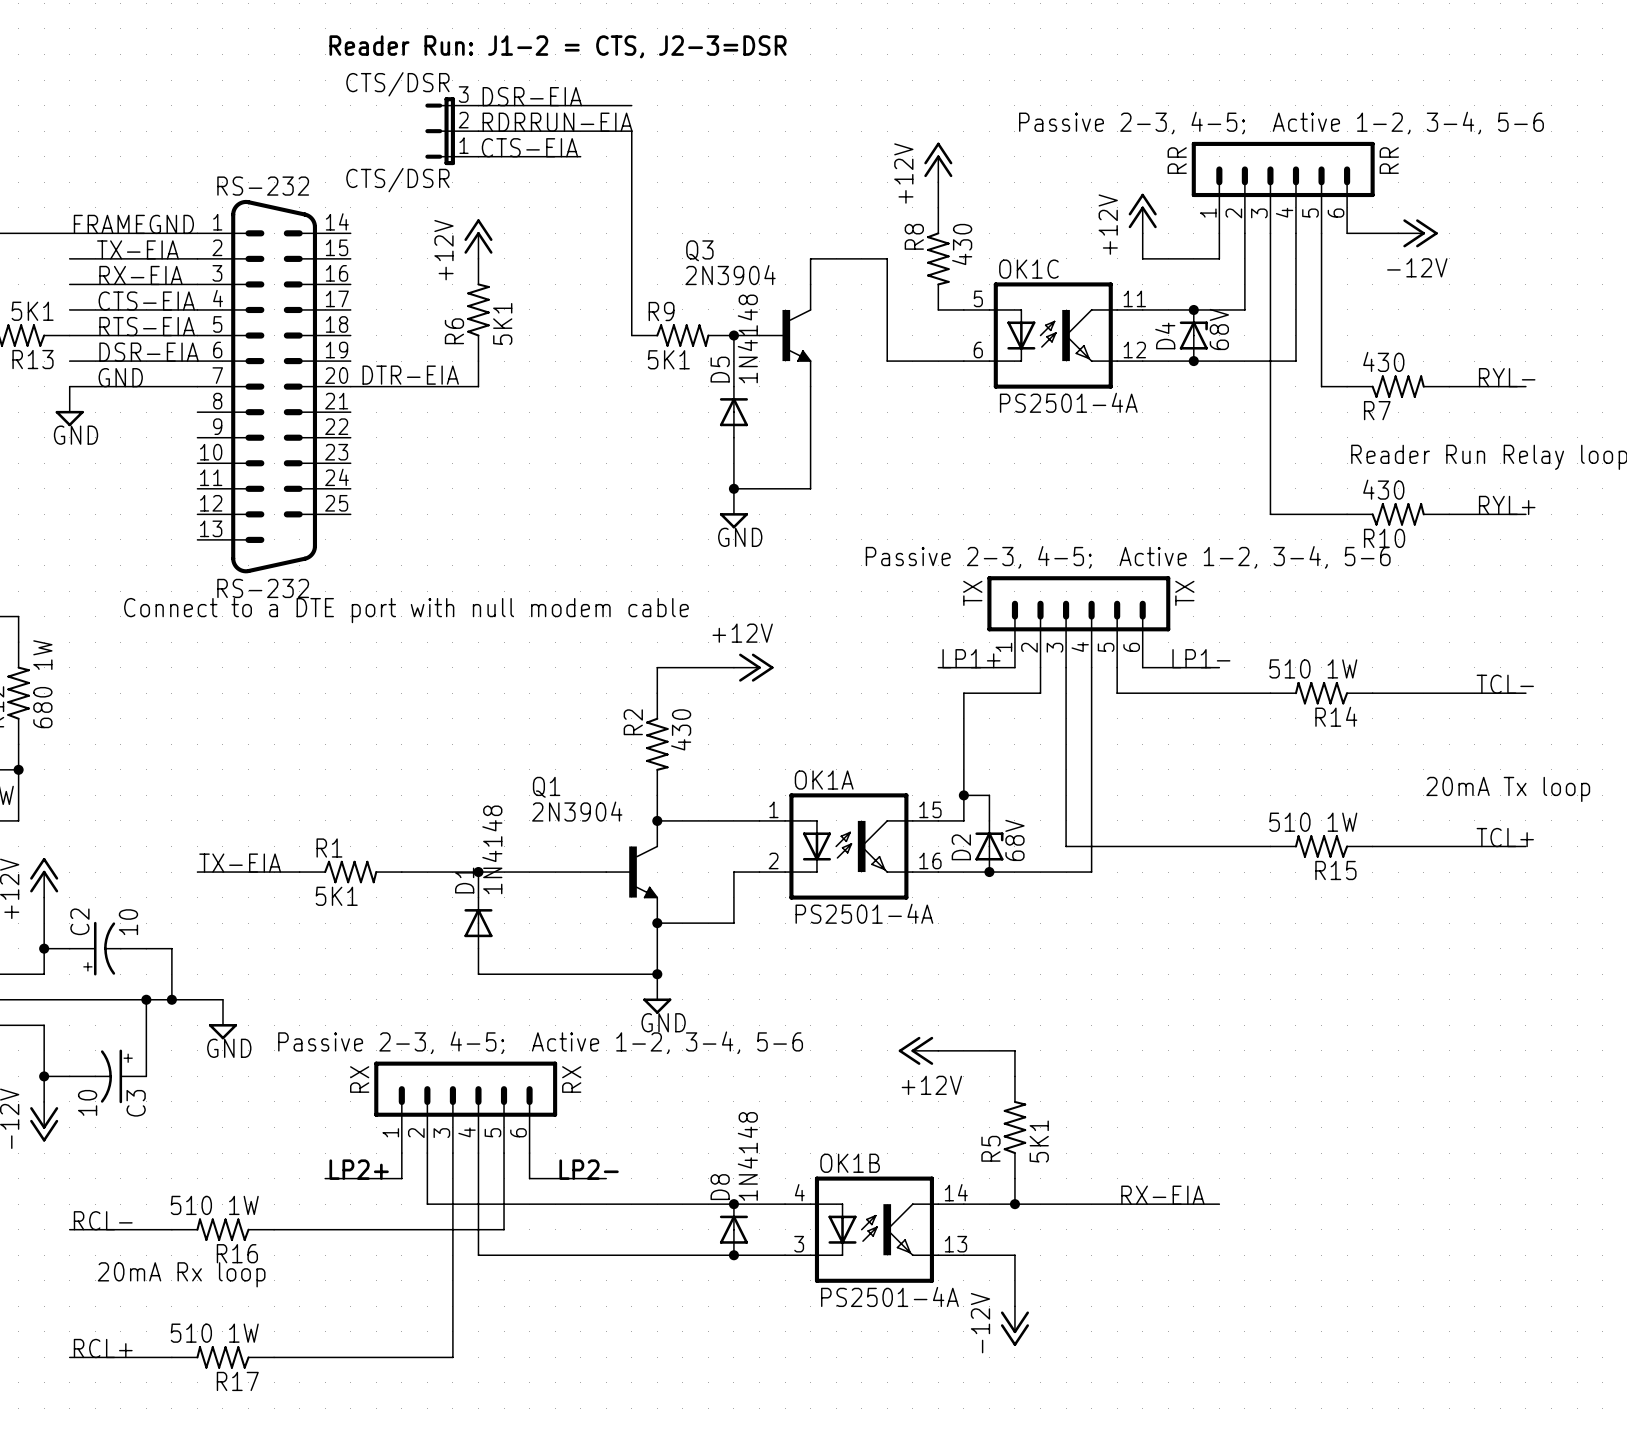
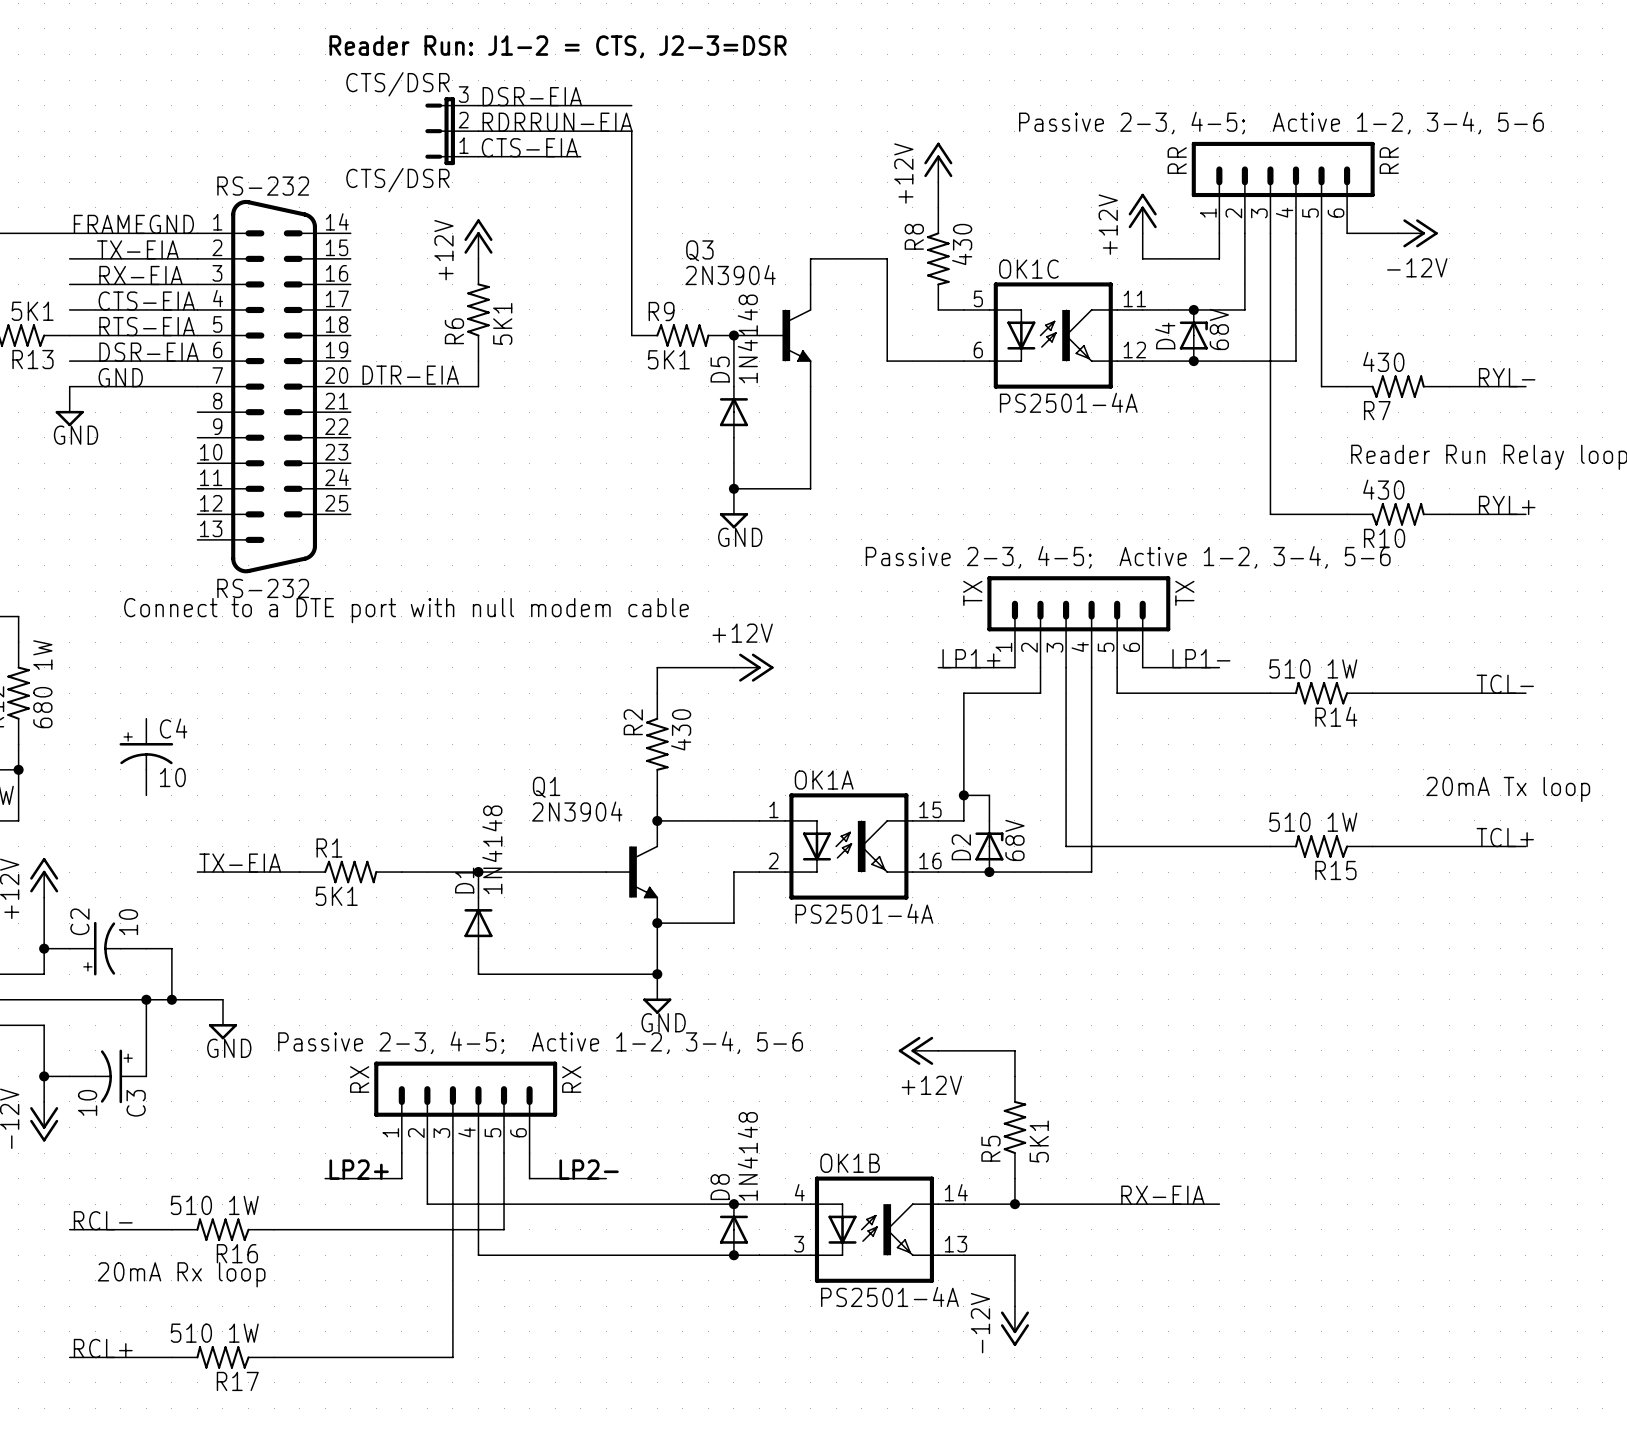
C4: none -> 10 (146, 757)

